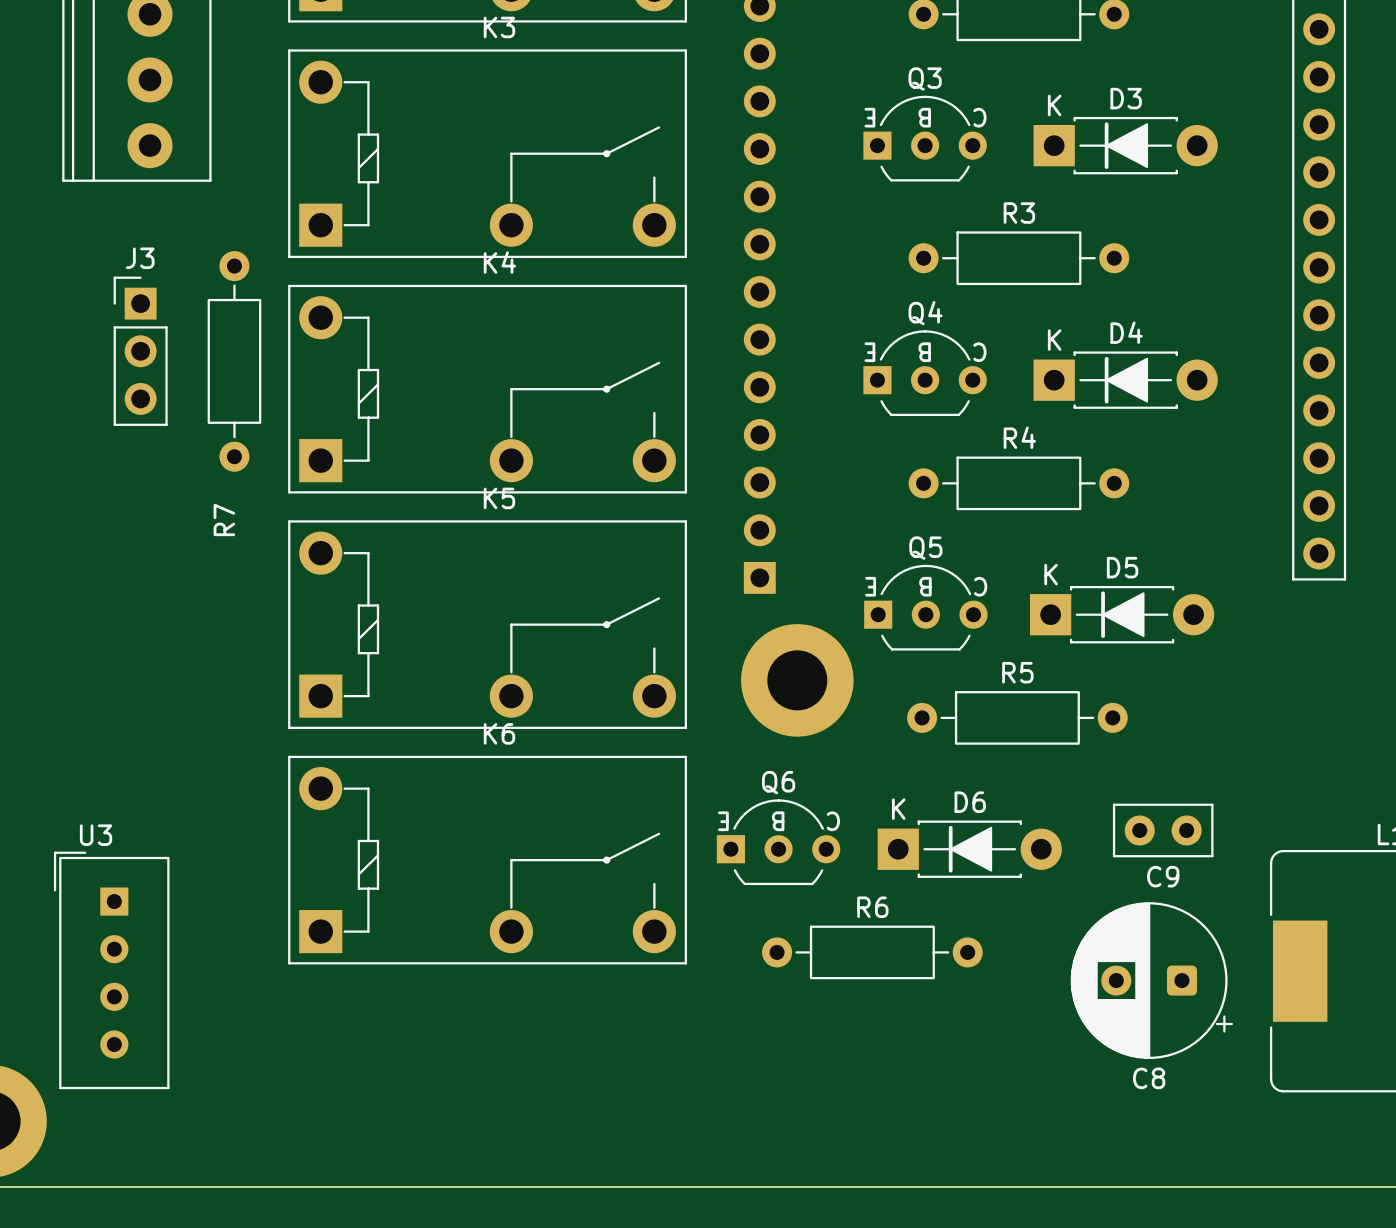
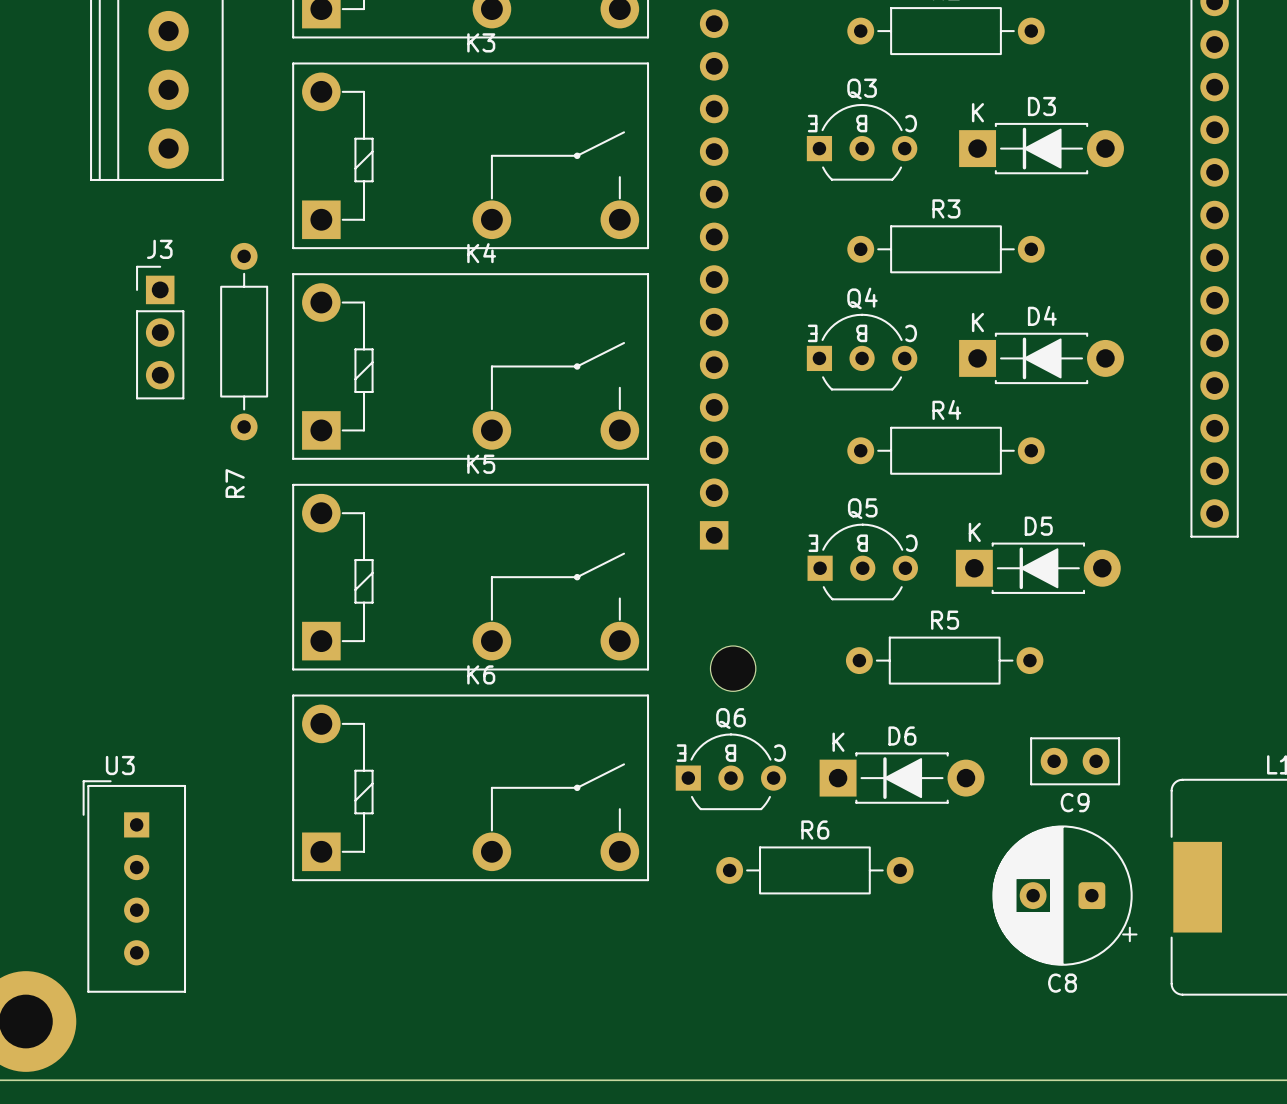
part: (797, 680) -> none
part: none -> (733, 668)

